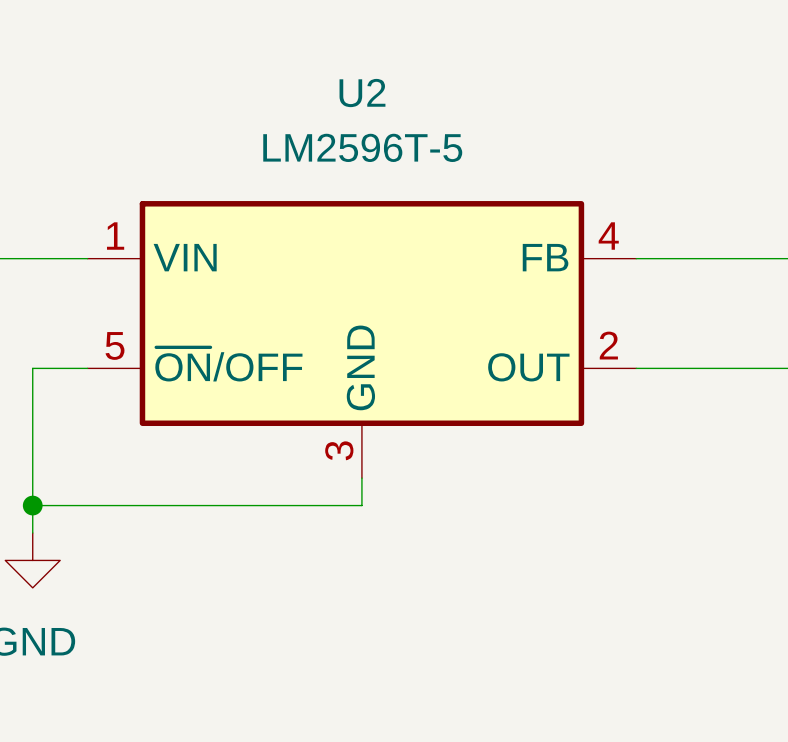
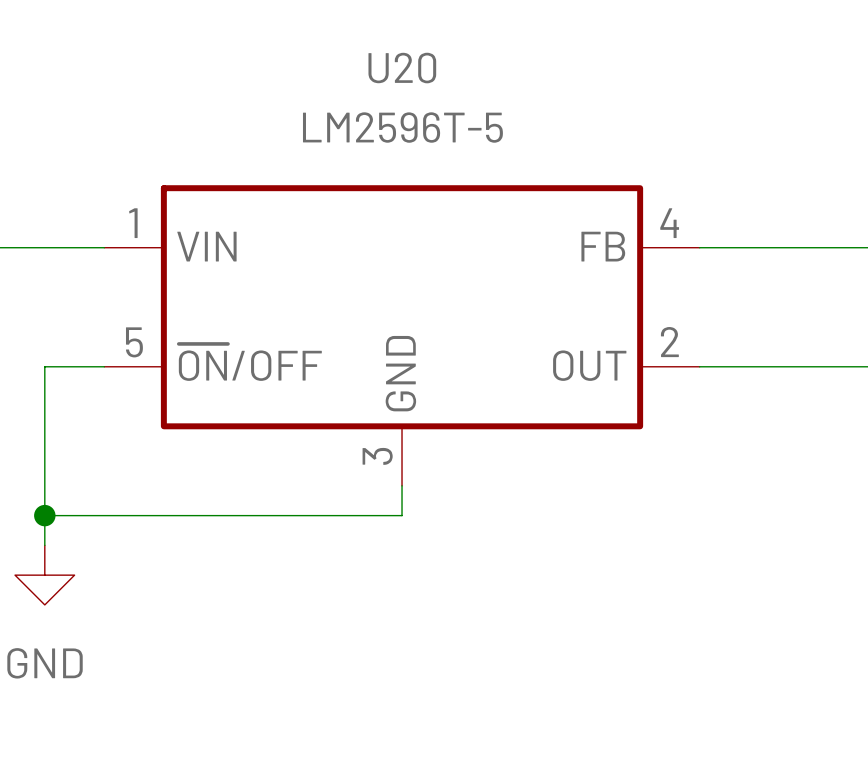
U2 name: U2 (362, 93) -> U20 (402, 68)

